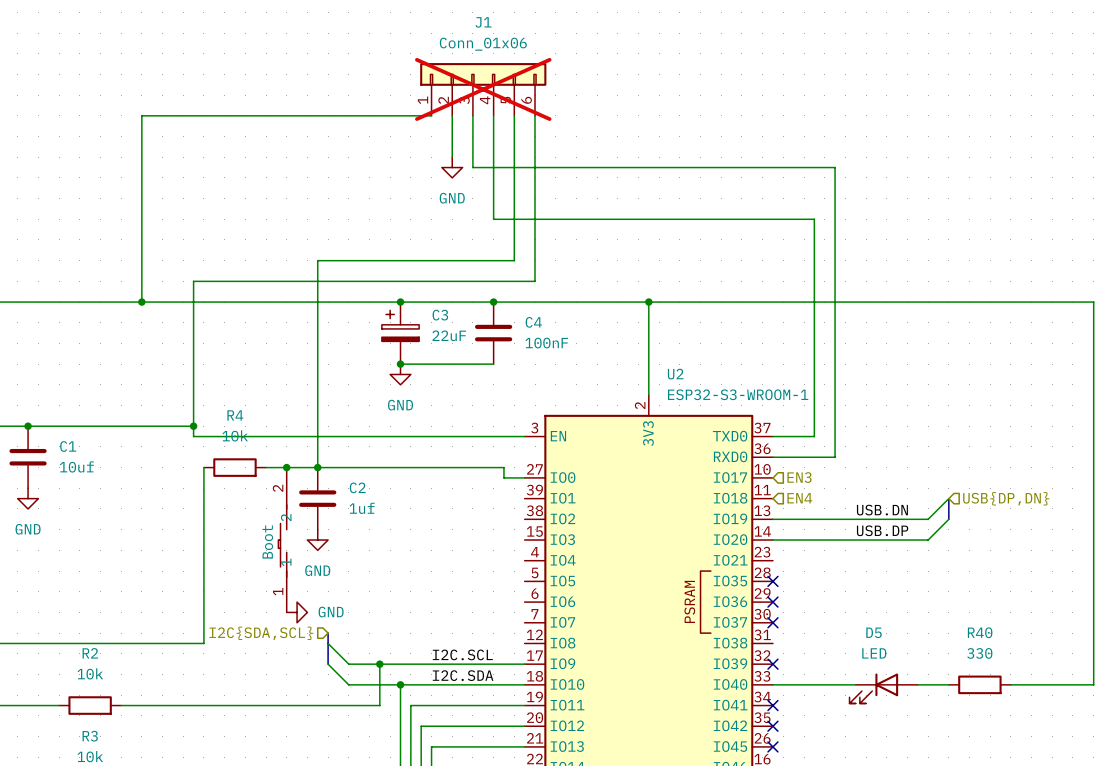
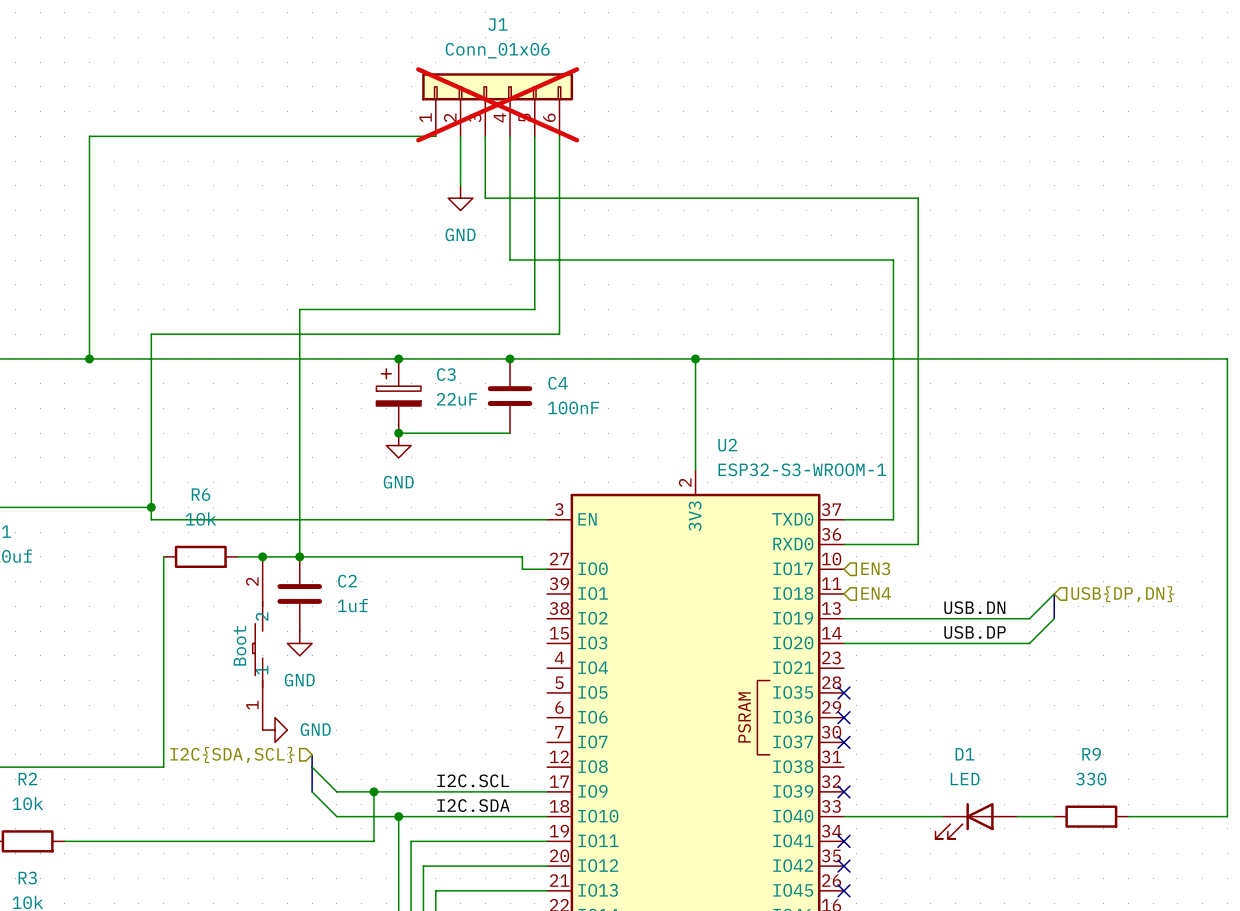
R4 name: R4 (235, 415) -> R6 (201, 494)
D5 name: D5 (874, 632) -> D1 (965, 754)
R40 name: R40 (980, 632) -> R9 (1091, 754)

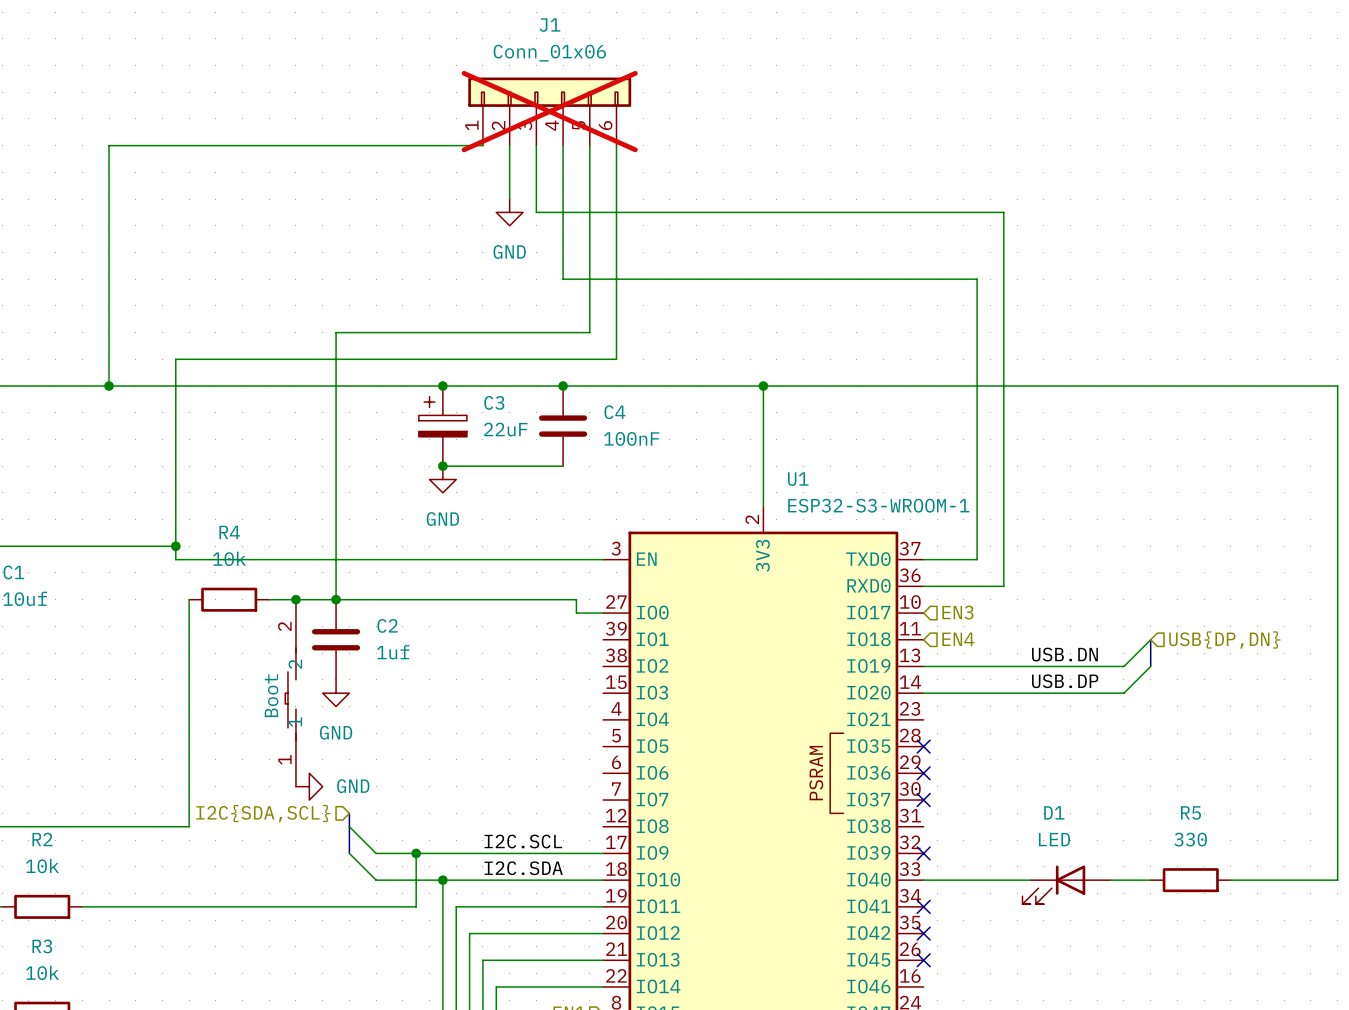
U2 name: U2 (727, 445) -> U1 (798, 479)
R6 name: R6 (201, 494) -> R4 (229, 532)
R9 name: R9 (1091, 754) -> R5 (1190, 812)

